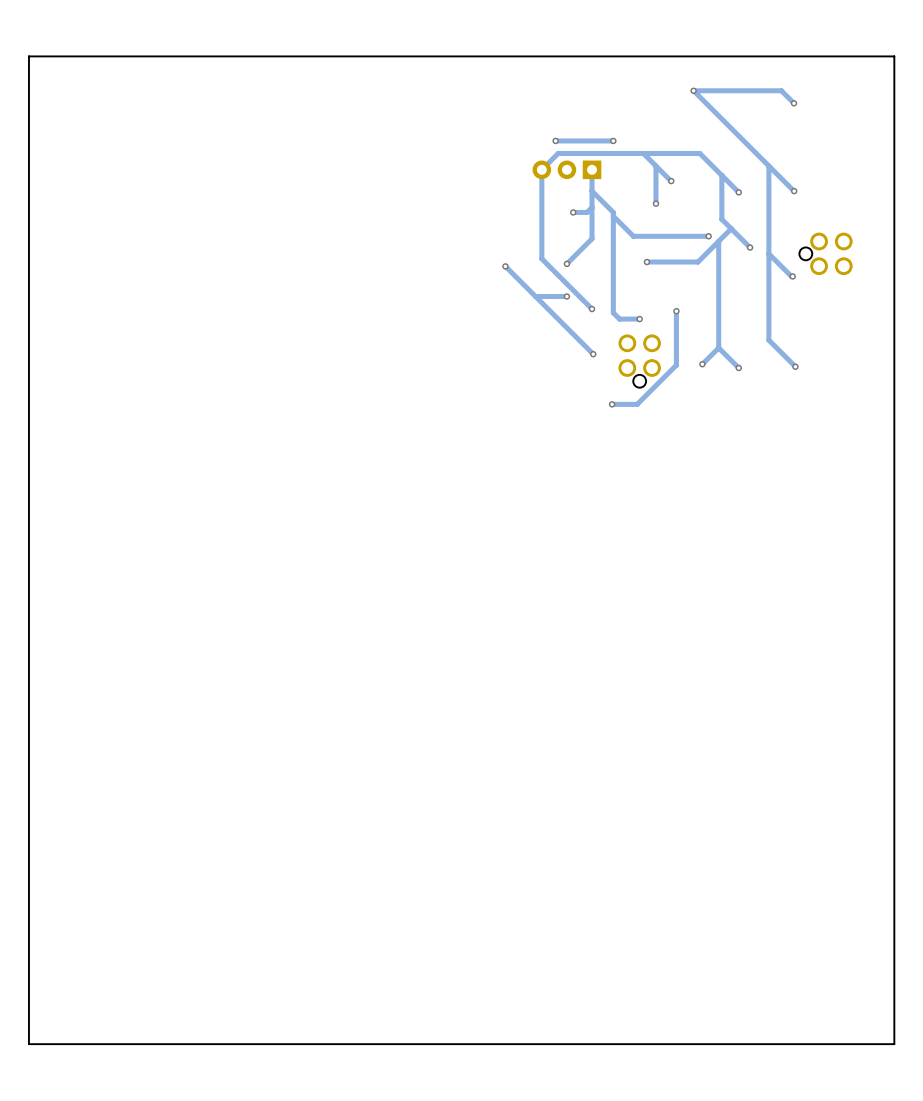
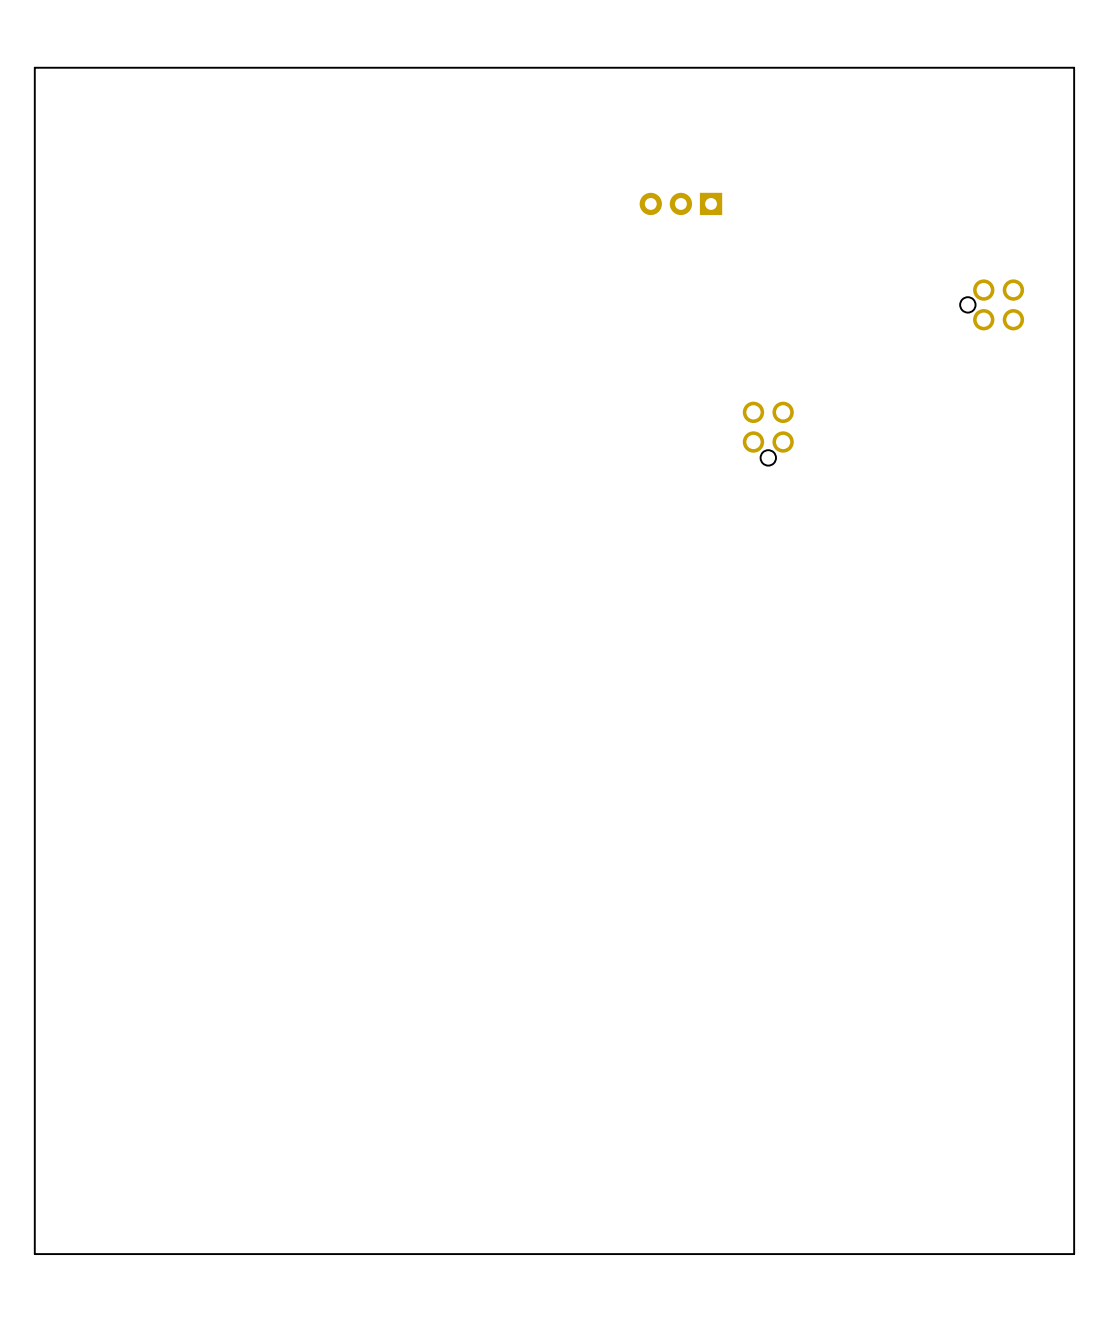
via: (693, 90) -> none
track: (793, 103) (781, 90) (693, 90) (794, 191) -> none
via: (793, 103) -> none
via: (555, 140) -> none
track: (613, 140) (555, 140) -> none
via: (613, 140) -> none
track: (643, 153) (671, 181) -> none
track: (655, 166) (655, 203) -> none
track: (768, 166) (768, 340) (795, 366) -> none
track: (592, 169) (592, 238) (566, 263) -> none
track: (721, 175) (721, 219) (750, 247) -> none
via: (671, 181) -> none
track: (592, 191) (613, 212) (613, 312) (619, 319) (639, 319) -> none
via: (794, 191) -> none
track: (738, 192) (699, 153) (558, 153) (541, 169) (541, 258) (592, 309) -> none
via: (738, 192) -> none
via: (655, 203) -> none
track: (592, 207) (587, 212) (573, 212) -> none
via: (573, 212) -> none
track: (613, 216) (633, 236) (708, 236) -> none
track: (731, 228) (697, 262) (646, 262) -> none
via: (708, 236) -> none
track: (718, 241) (718, 347) -> none
via: (750, 247) -> none
track: (768, 253) (792, 276) -> none
via: (646, 262) -> none
via: (566, 263) -> none
track: (505, 266) (593, 354) -> none
via: (505, 266) -> none
via: (792, 276) -> none
track: (566, 296) (535, 296) -> none
via: (566, 296) -> none
via: (592, 309) -> none
track: (676, 311) (676, 365) (637, 404) (612, 404) -> none
via: (676, 311) -> none
via: (639, 319) -> none
track: (718, 347) (738, 368) -> none
track: (718, 347) (702, 364) -> none
via: (593, 354) -> none
via: (702, 364) -> none
via: (795, 366) -> none
via: (738, 368) -> none
via: (612, 404) -> none

